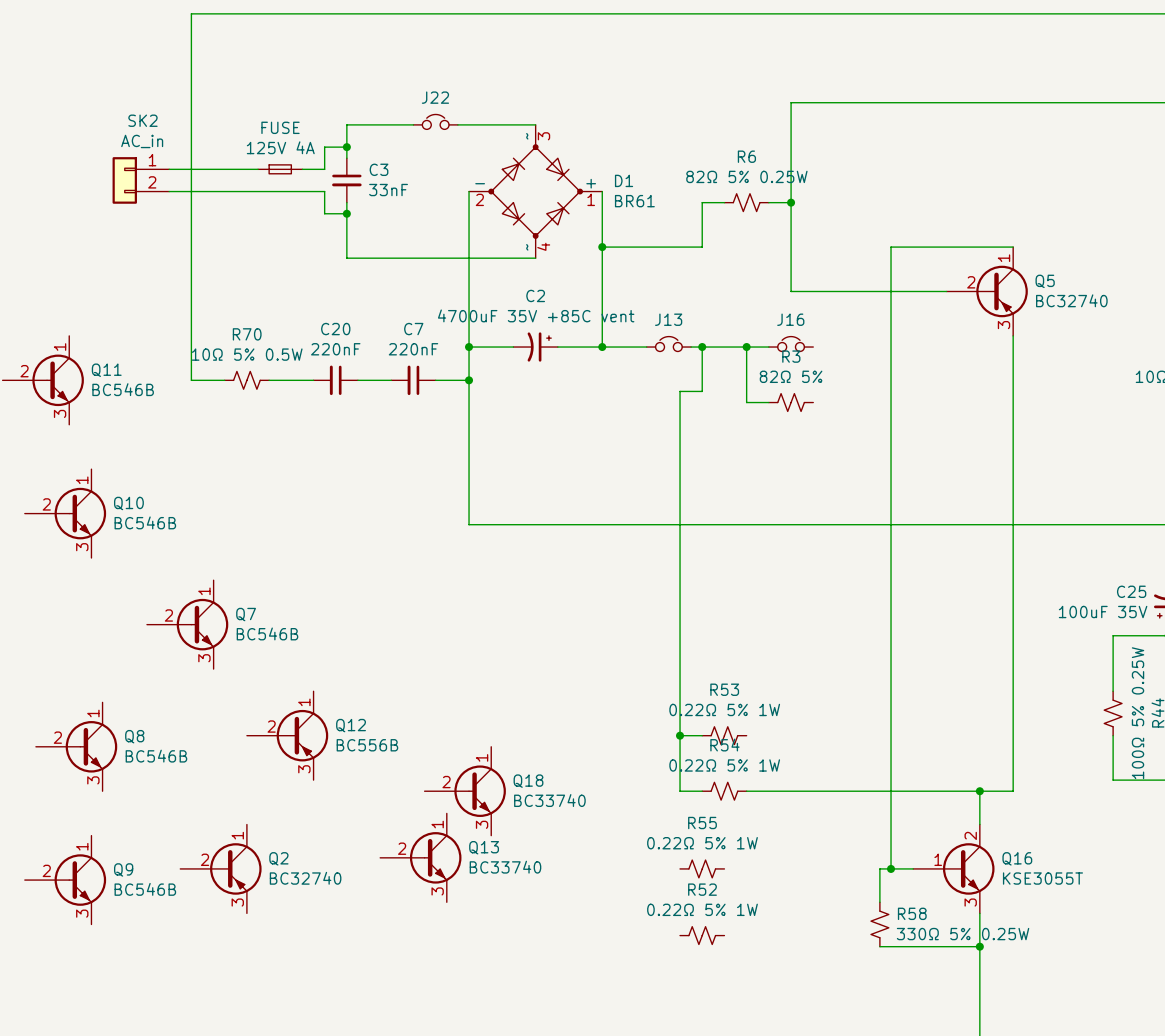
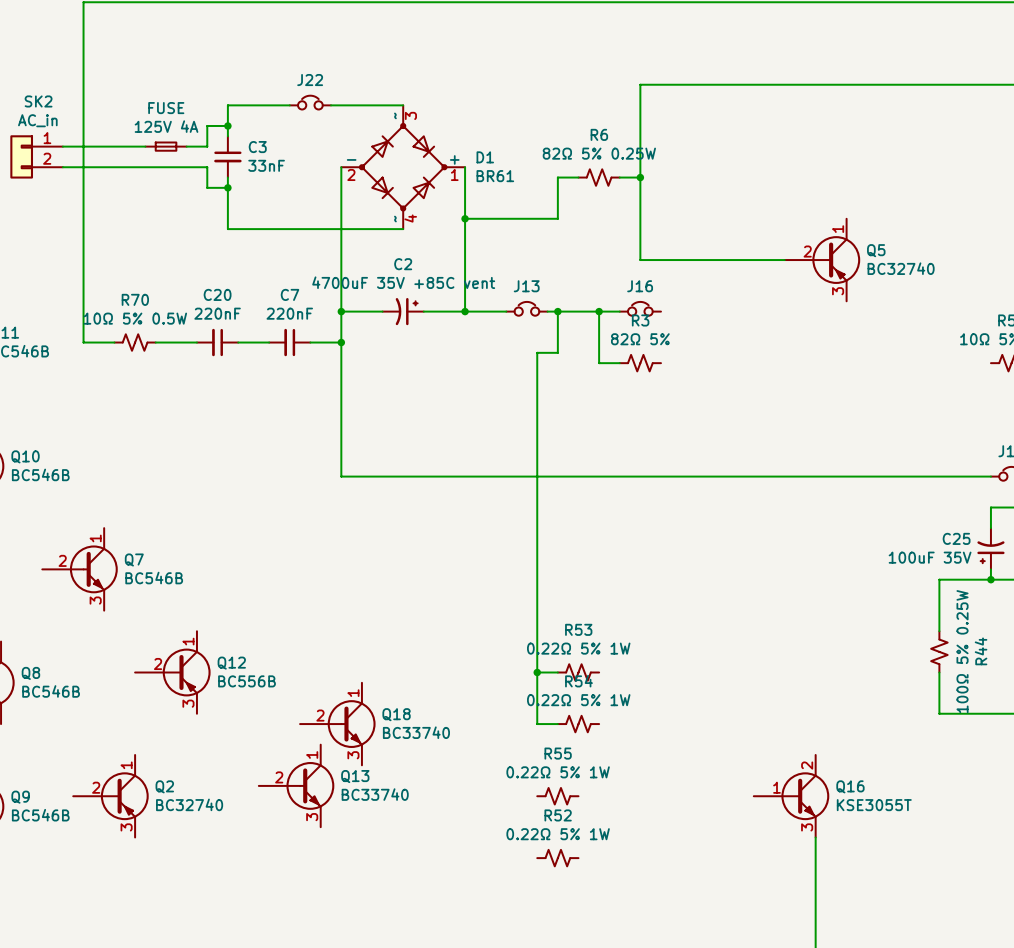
wire: (1013, 247) (891, 247) (891, 868) -> none
wire: (1013, 335) (1013, 791) (746, 791) -> none
wire: (979, 791) (979, 824) -> none
junction: (979, 791) -> none
junction: (891, 868) -> none
wire: (913, 868) (879, 868) (879, 902) -> none
R58: 330Ω 5% 0.25W (879, 924) -> none
wire: (879, 946) (979, 946) -> none
junction: (979, 946) -> none

